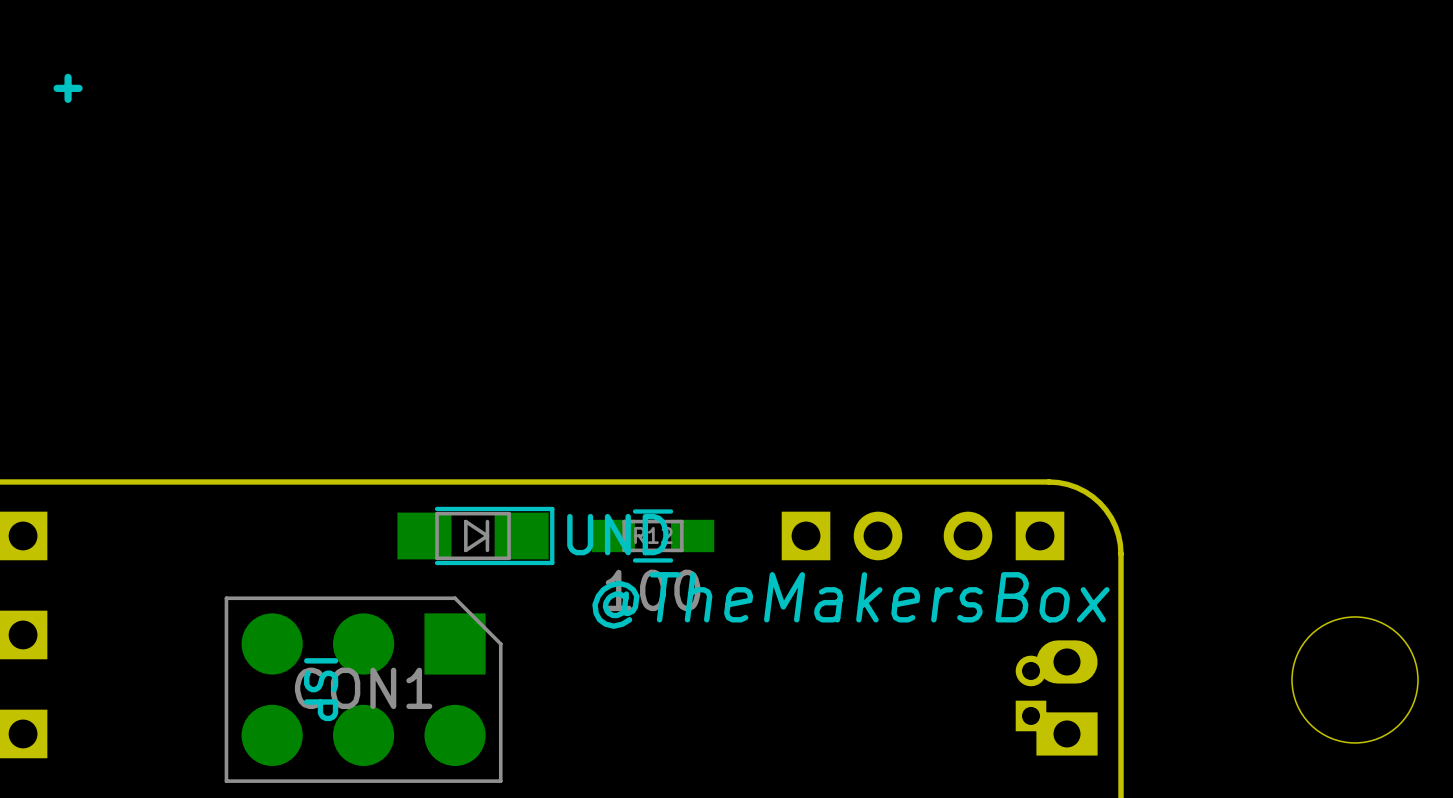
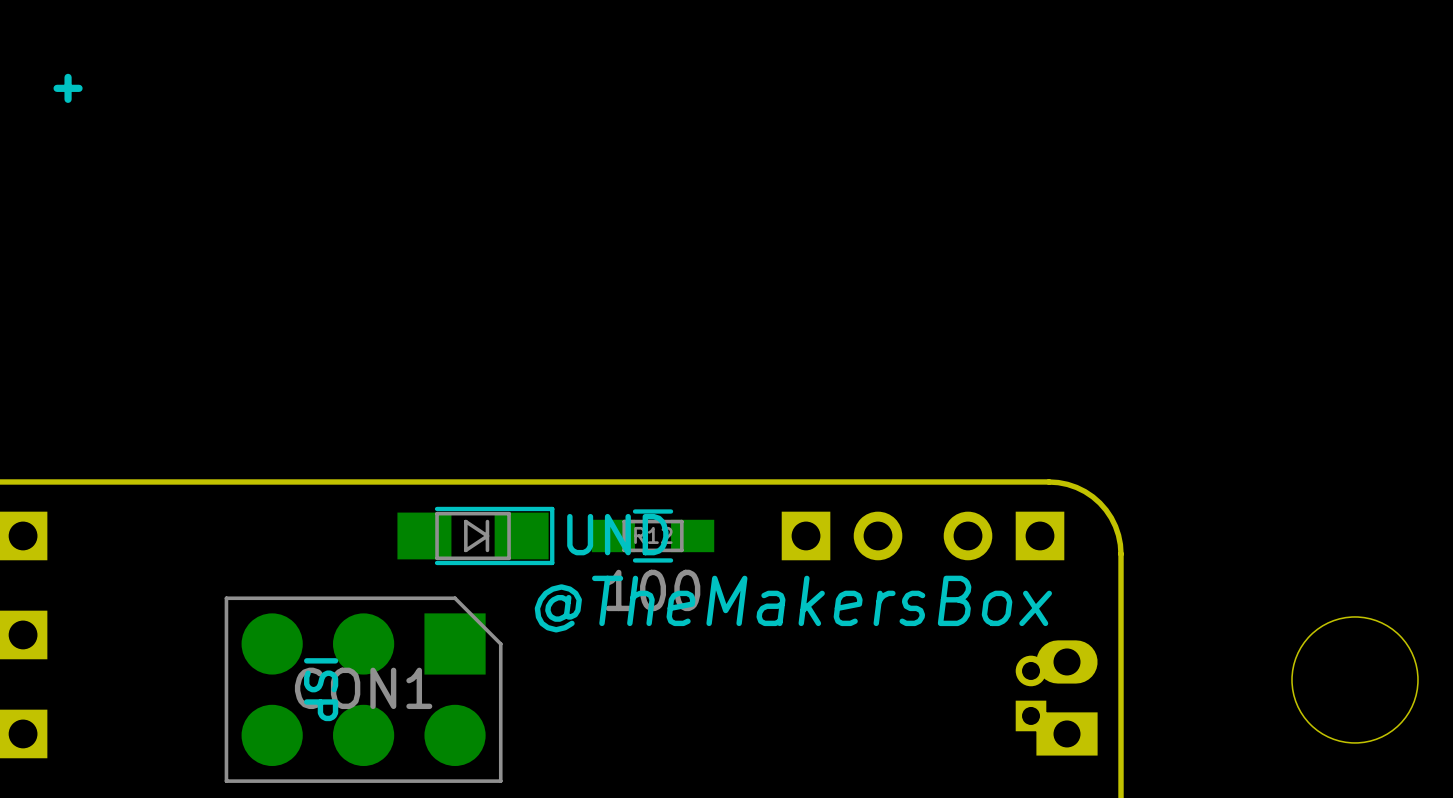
text position: @TheMakersBox (850, 600) -> @TheMakersBox (793, 604)

